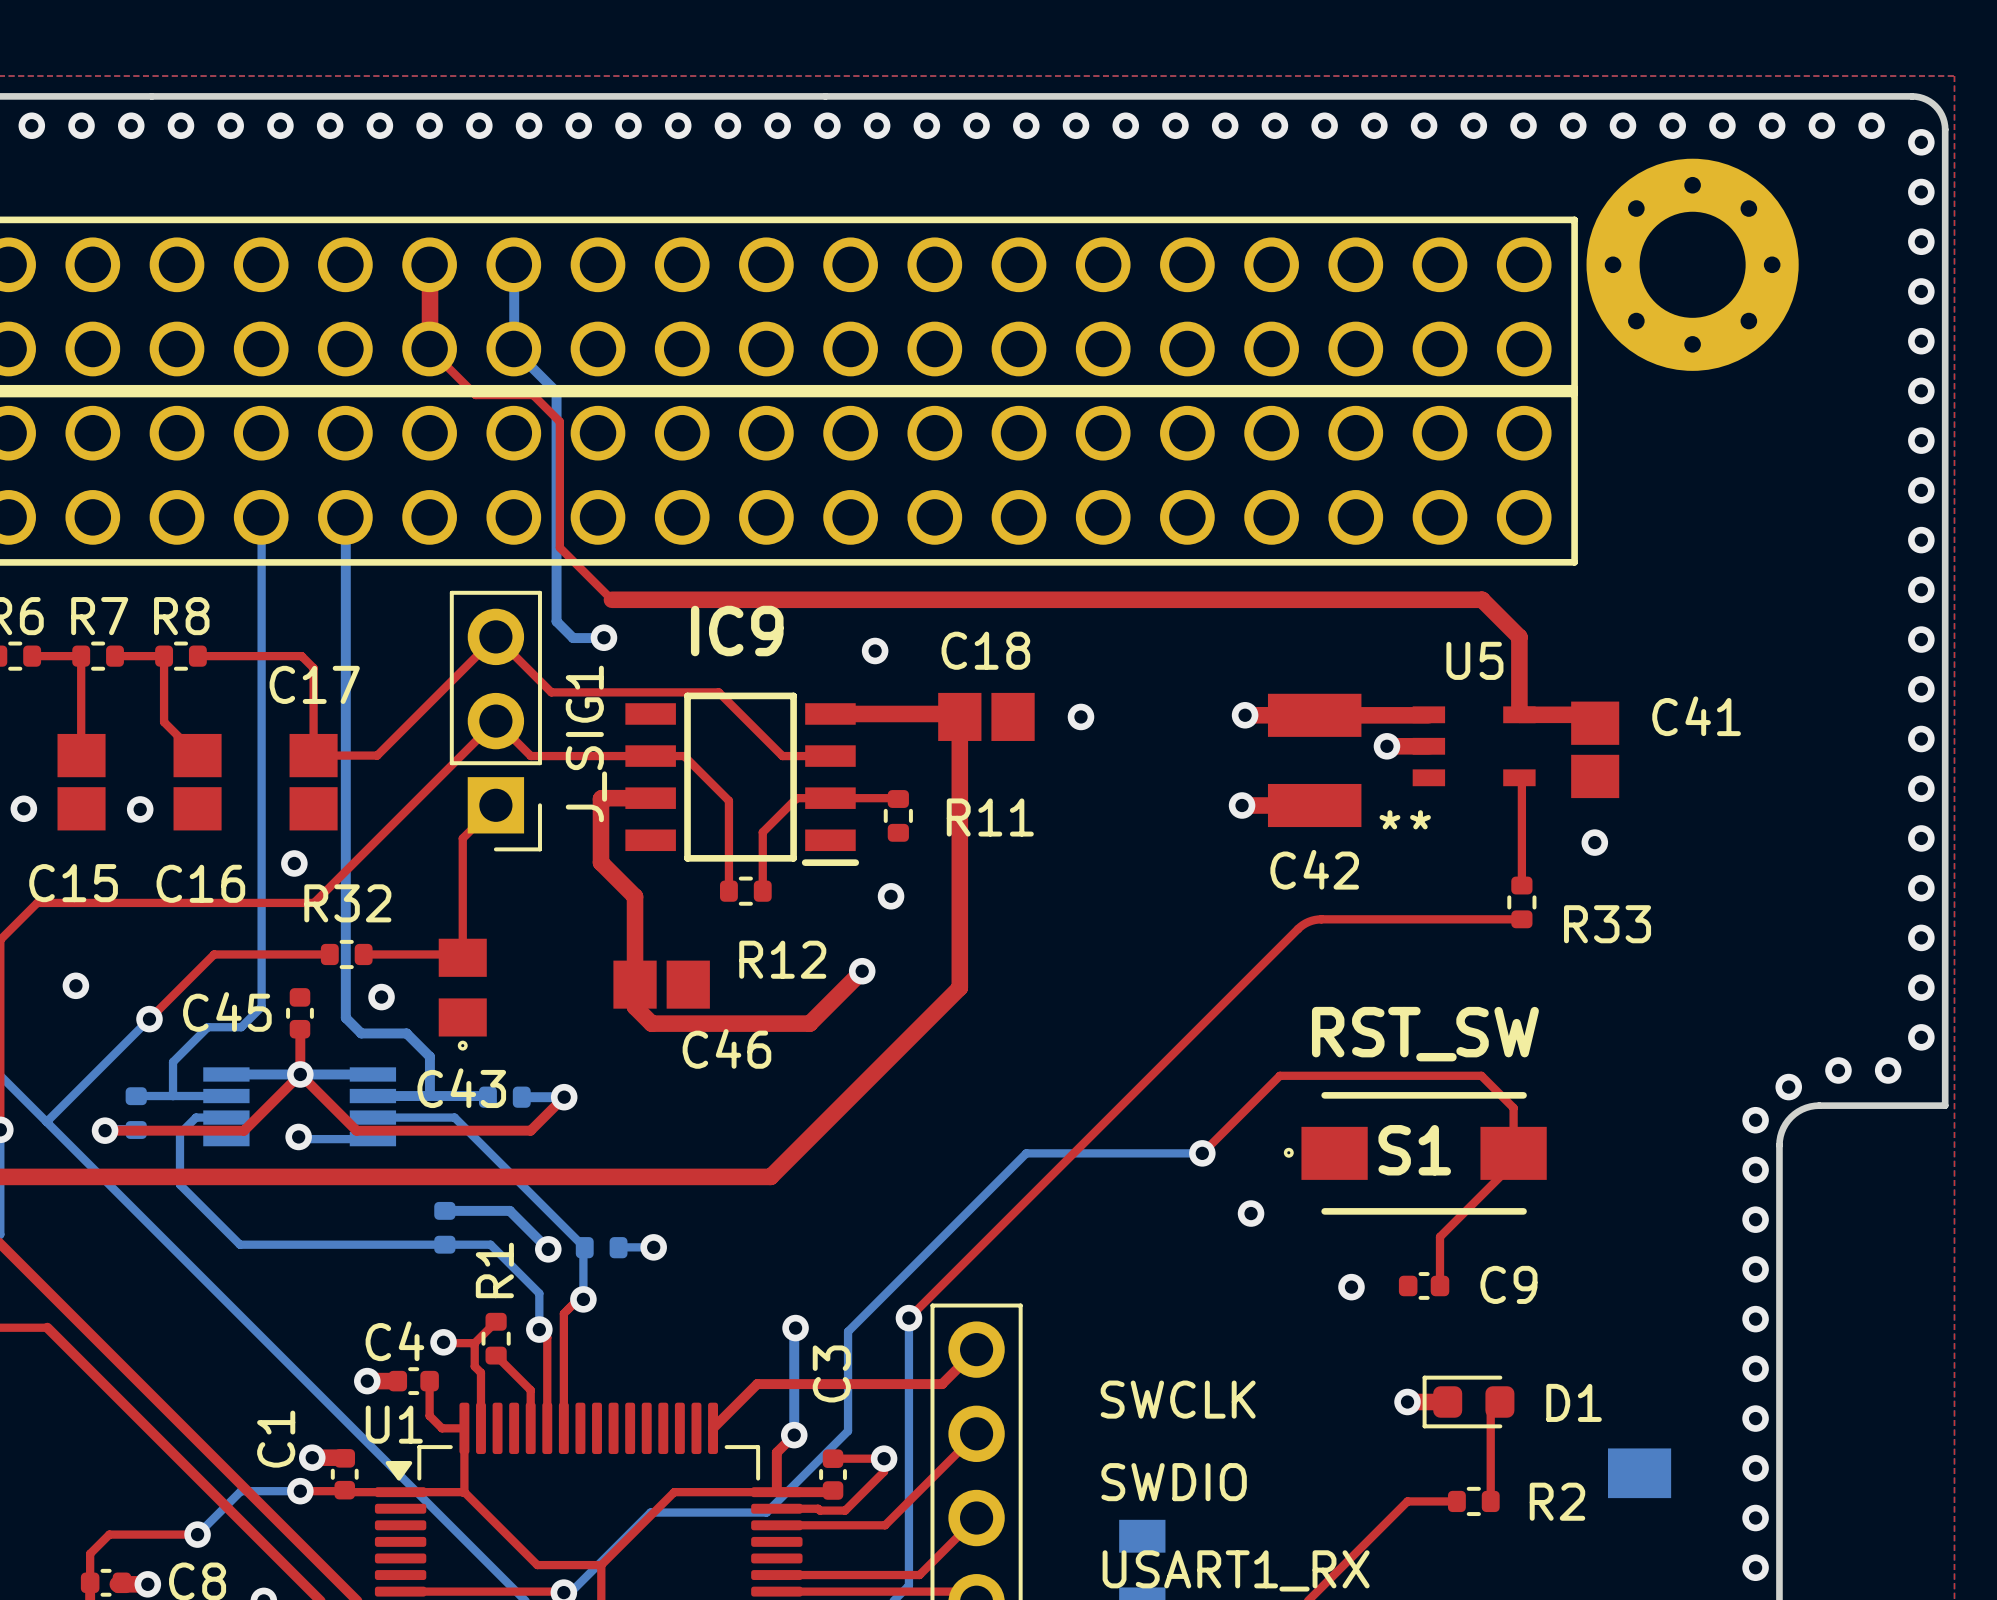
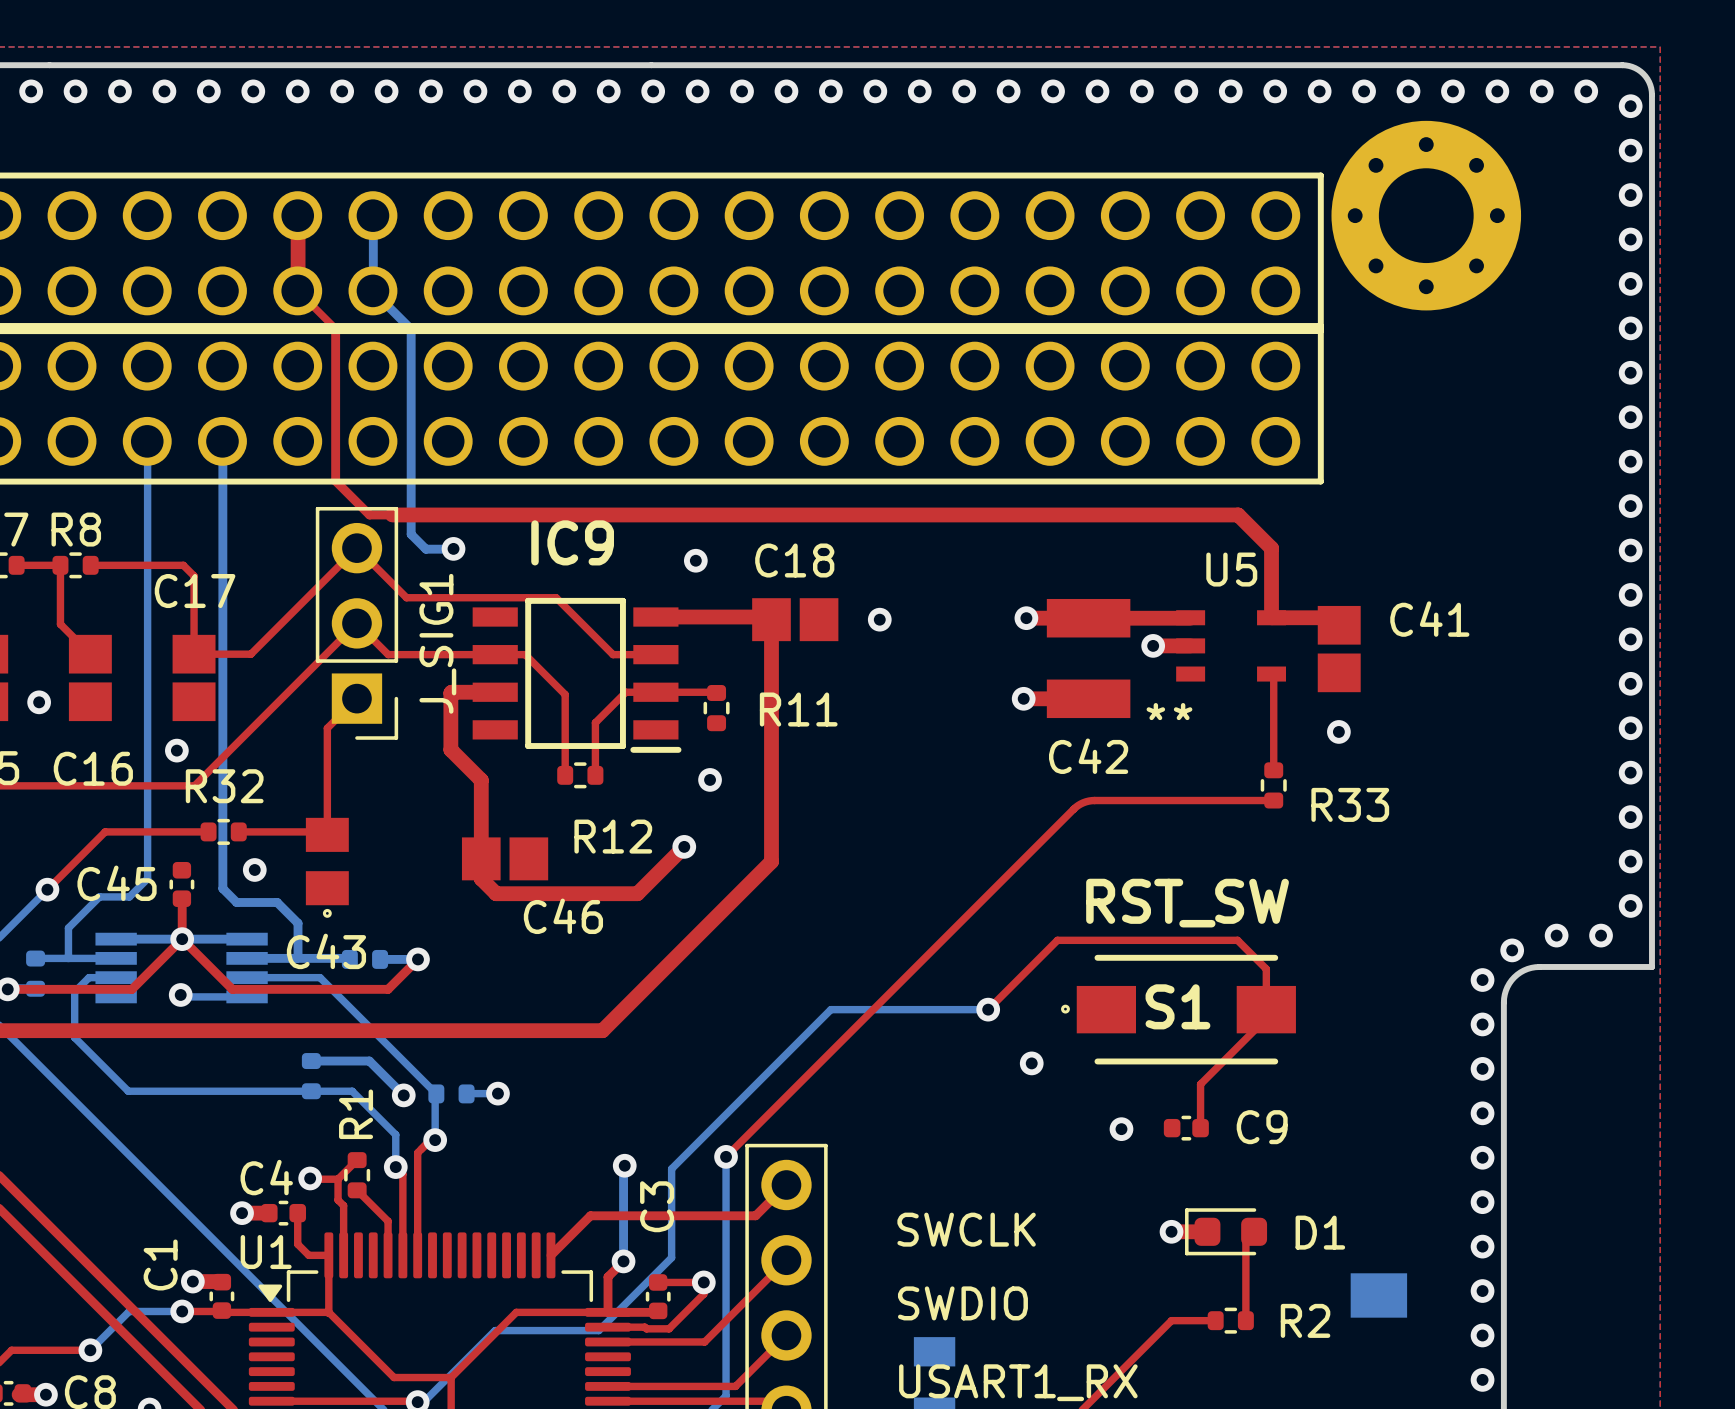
top track: (472, 391) (475, 395) (533, 395) (559, 421) (559, 547) (611, 599) -> (335, 328) (335, 481) (369, 514) (460, 514)

